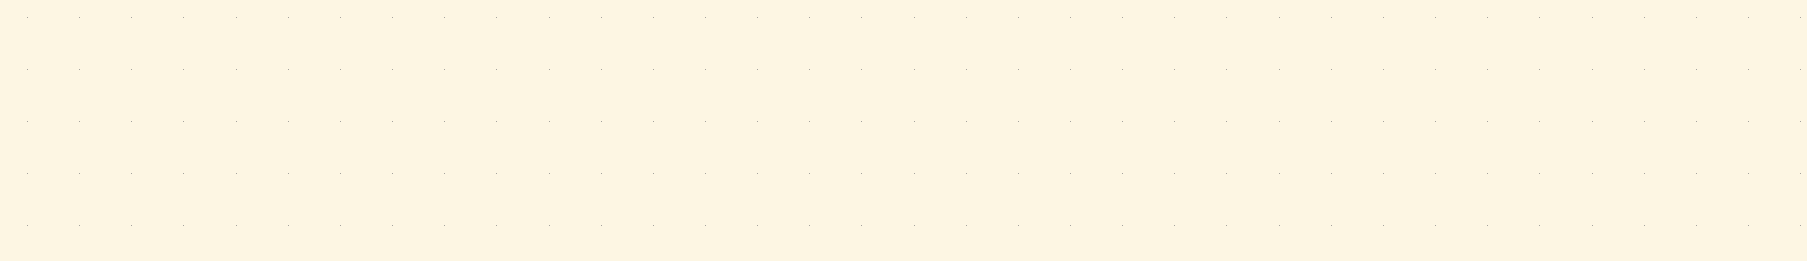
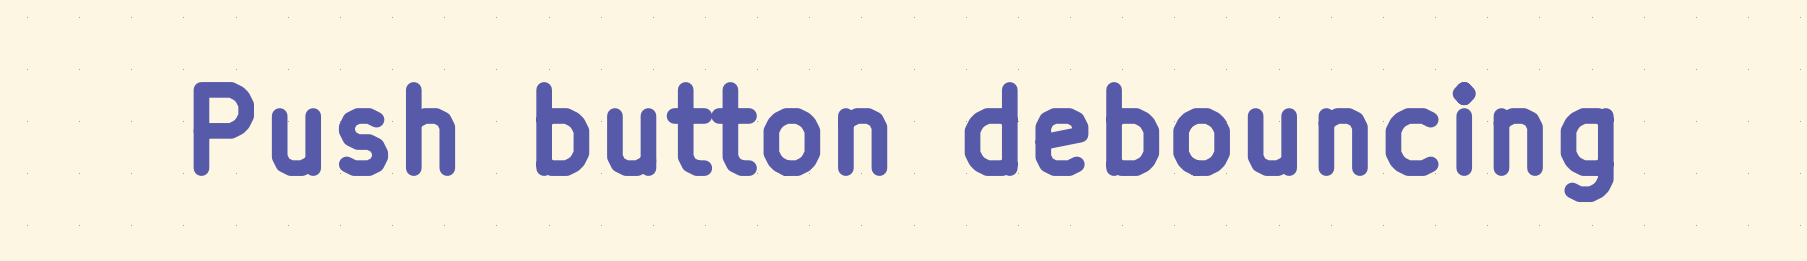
text: none -> Push button debouncing (903, 142)

